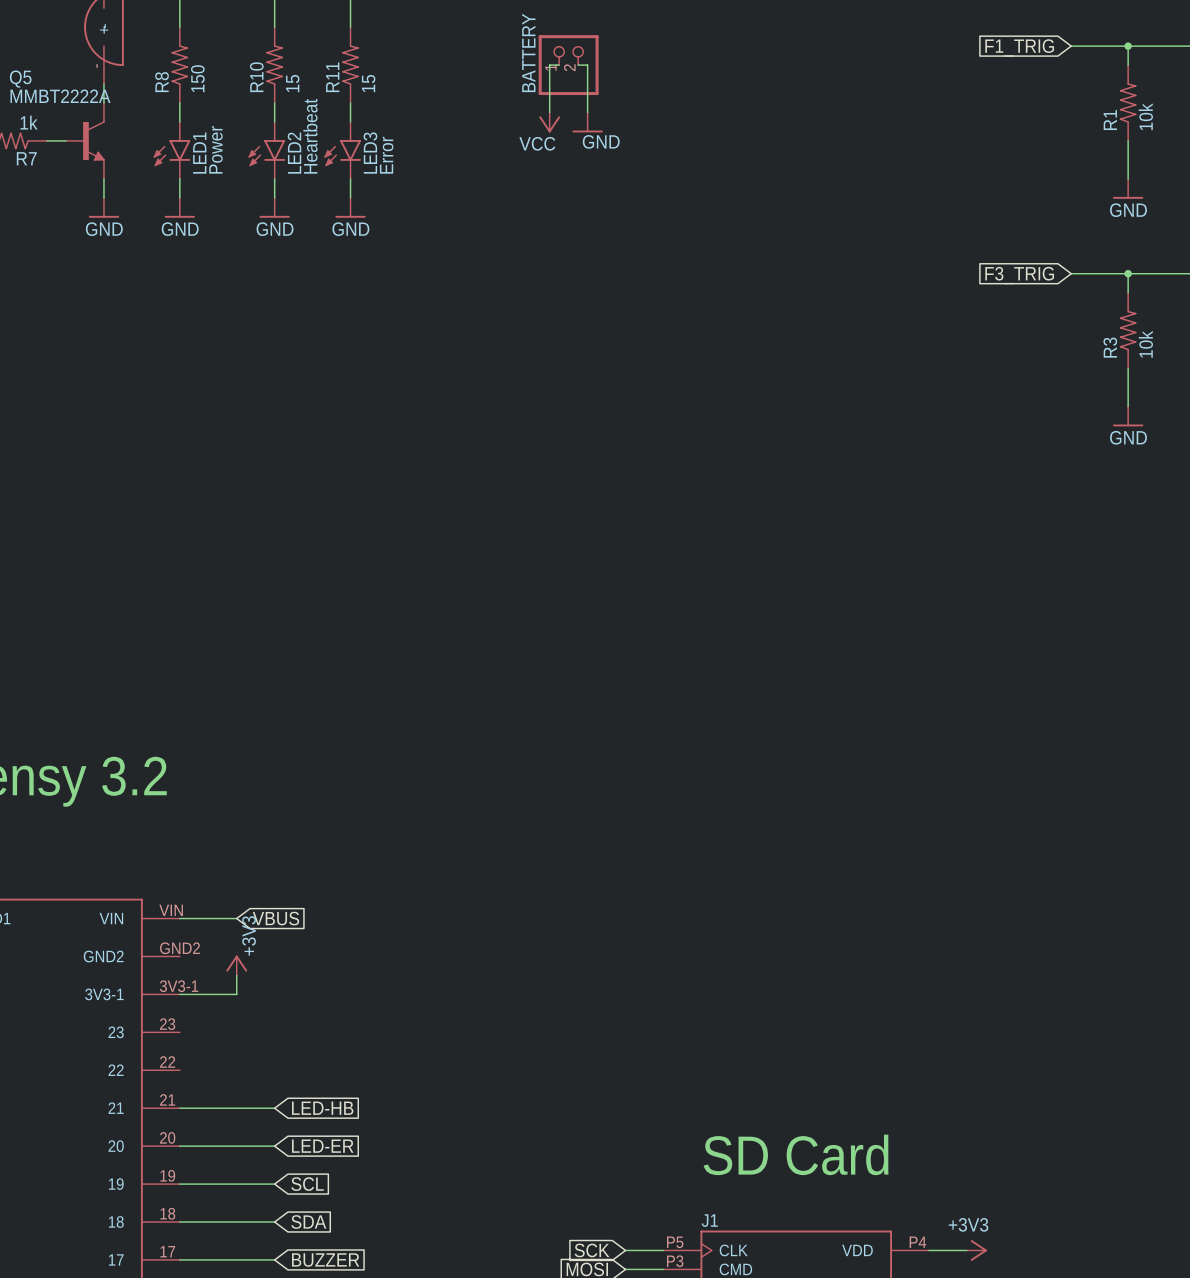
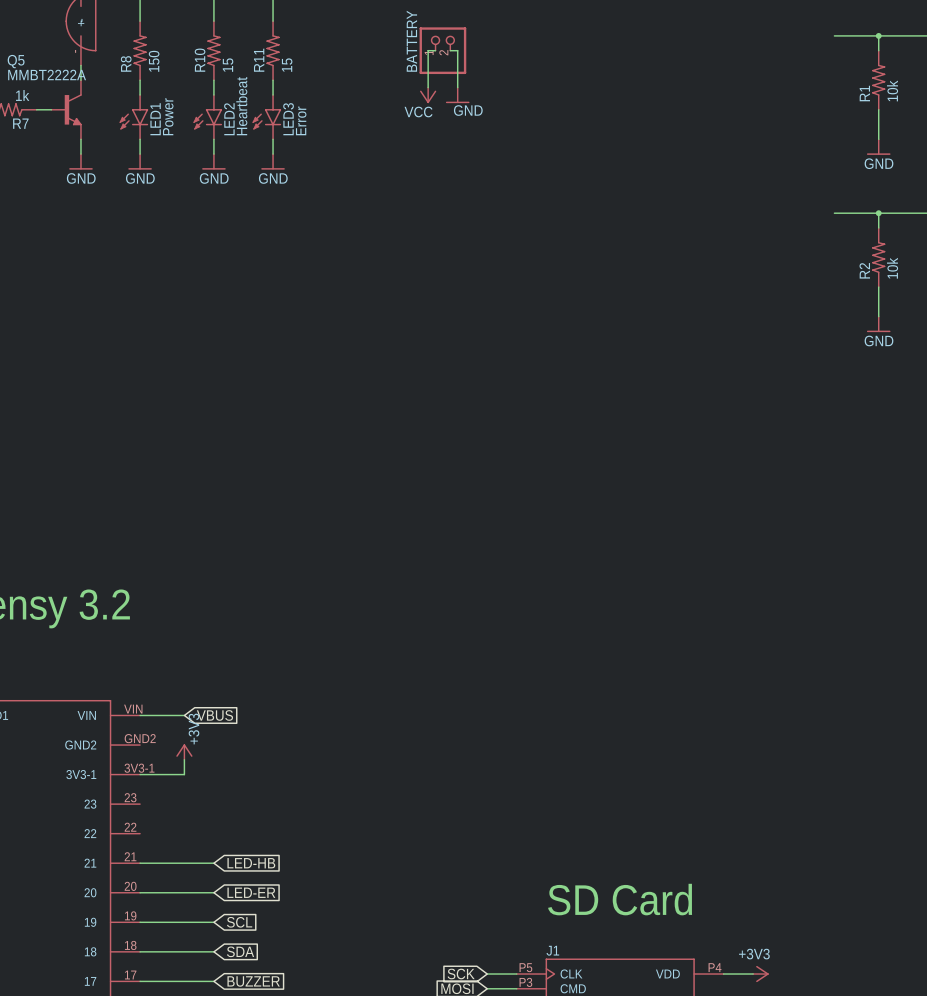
global label: F1_TRIG (1019, 47) -> none
global label: F3_TRIG (1019, 275) -> none
R3 name: R3 (1110, 347) -> R2 (864, 270)

